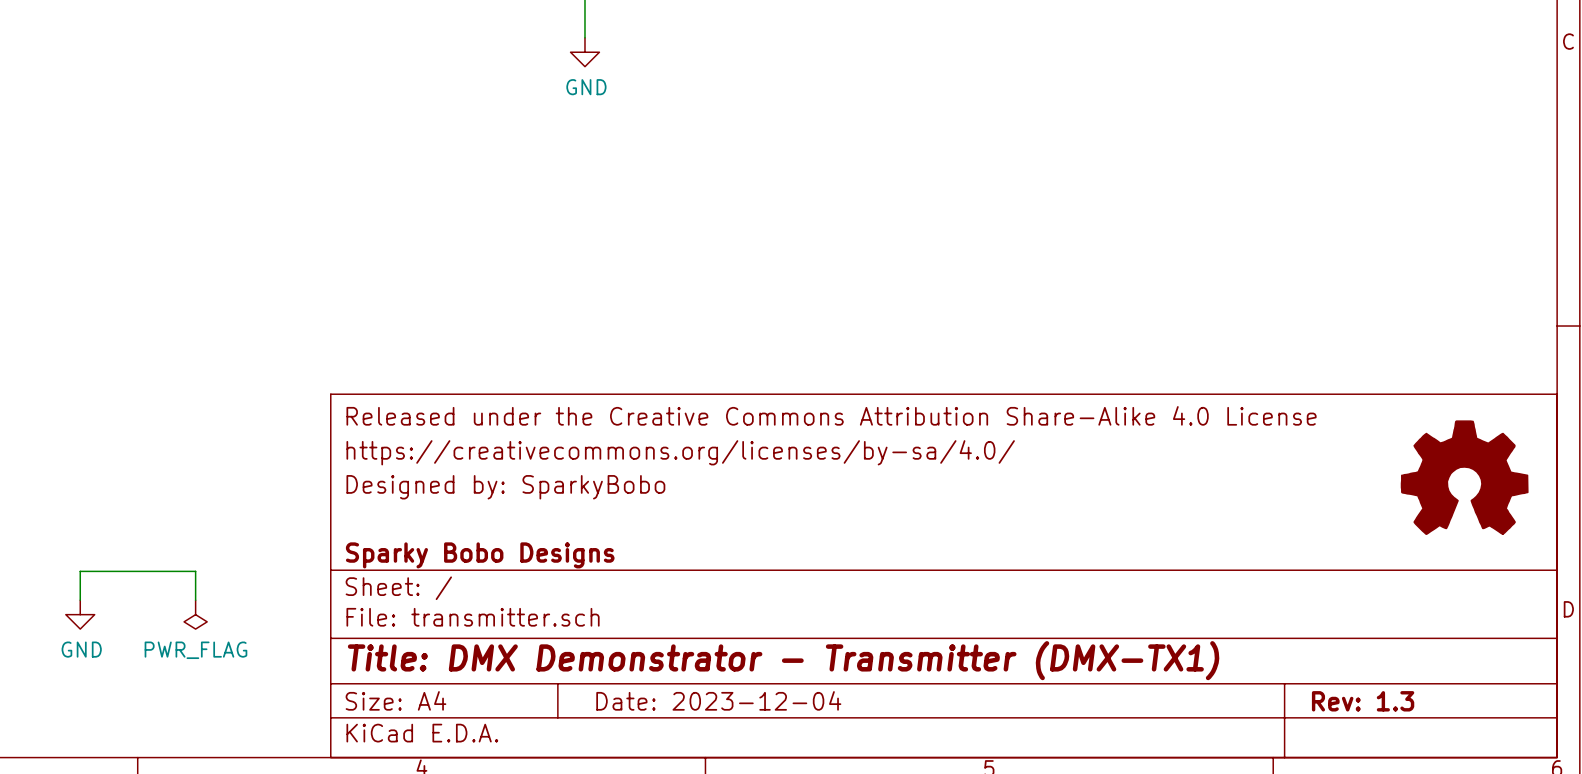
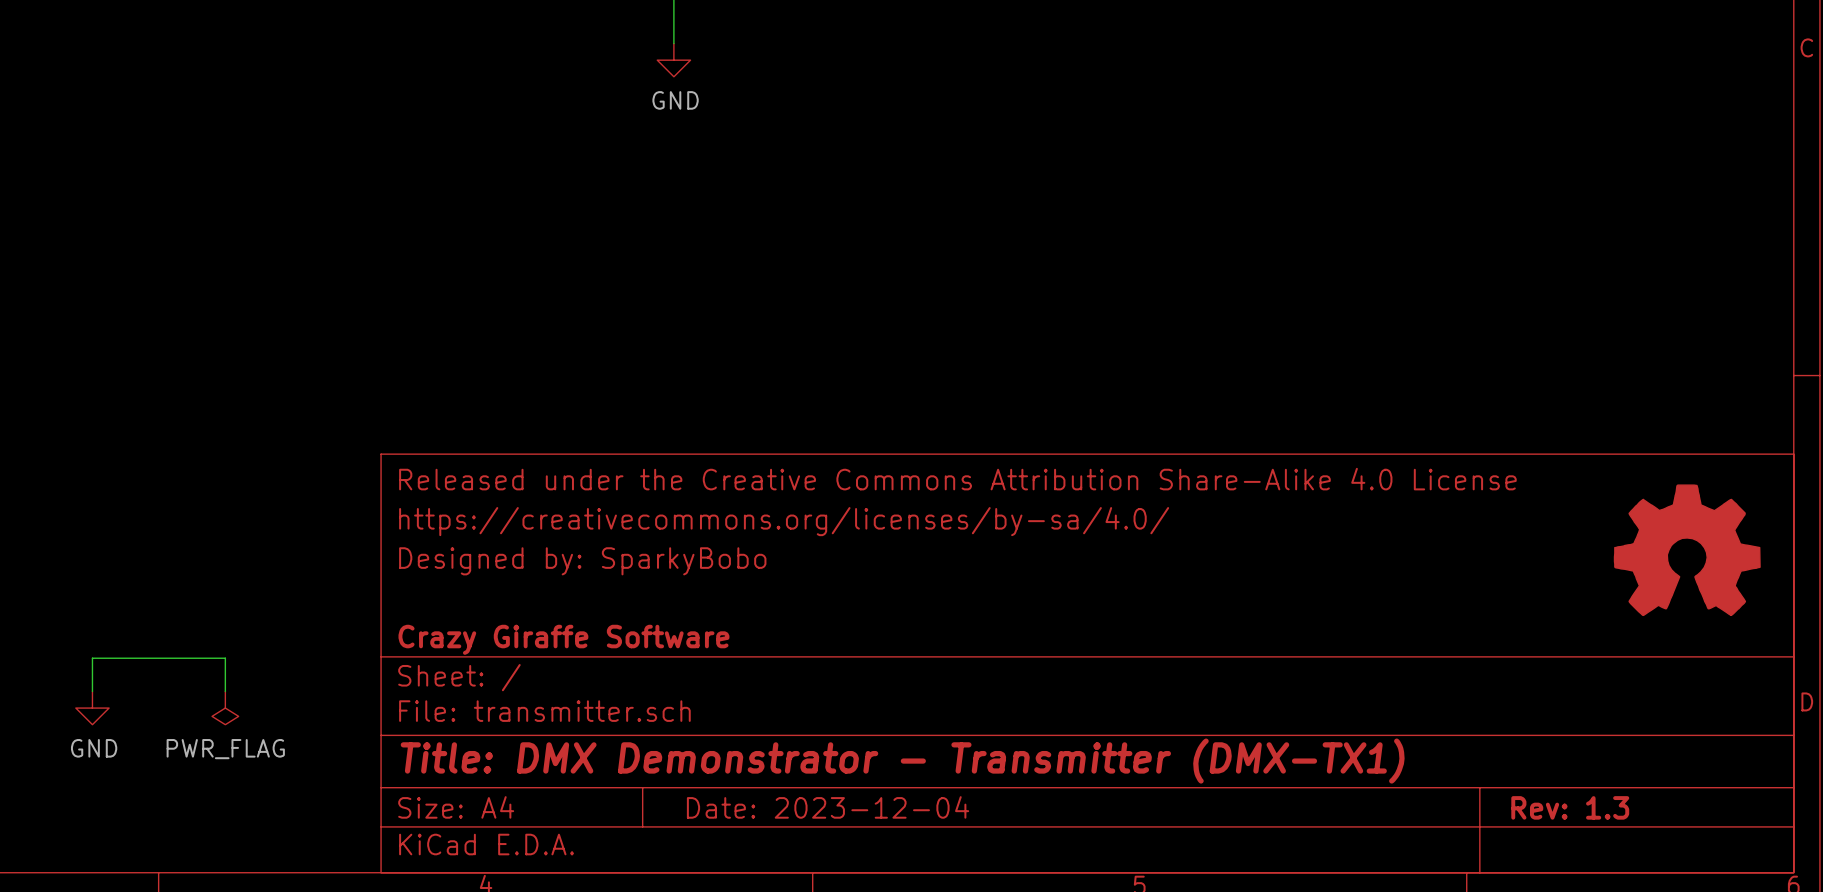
title block: Sparky Bobo Designs (480, 555) -> Crazy Giraffe Software (563, 639)

